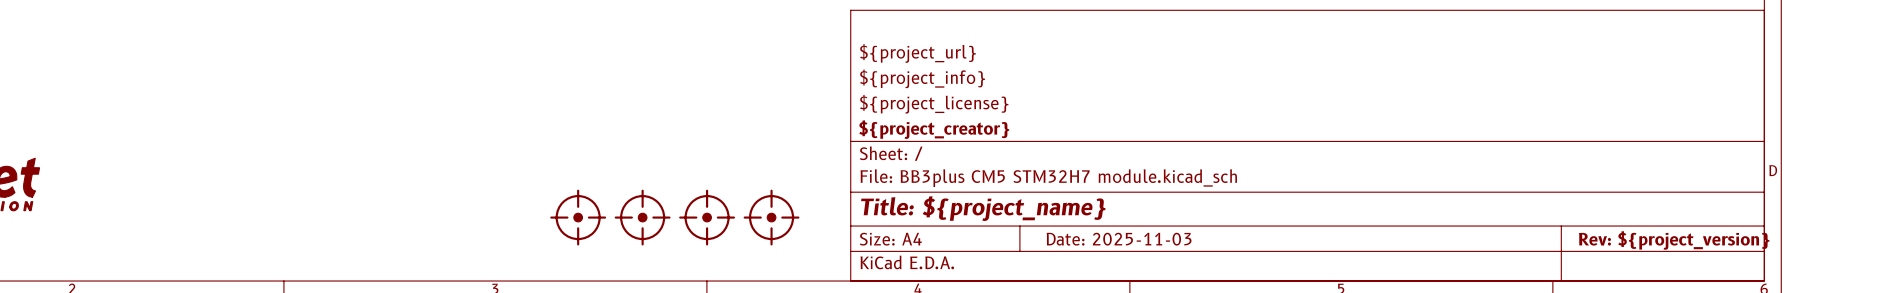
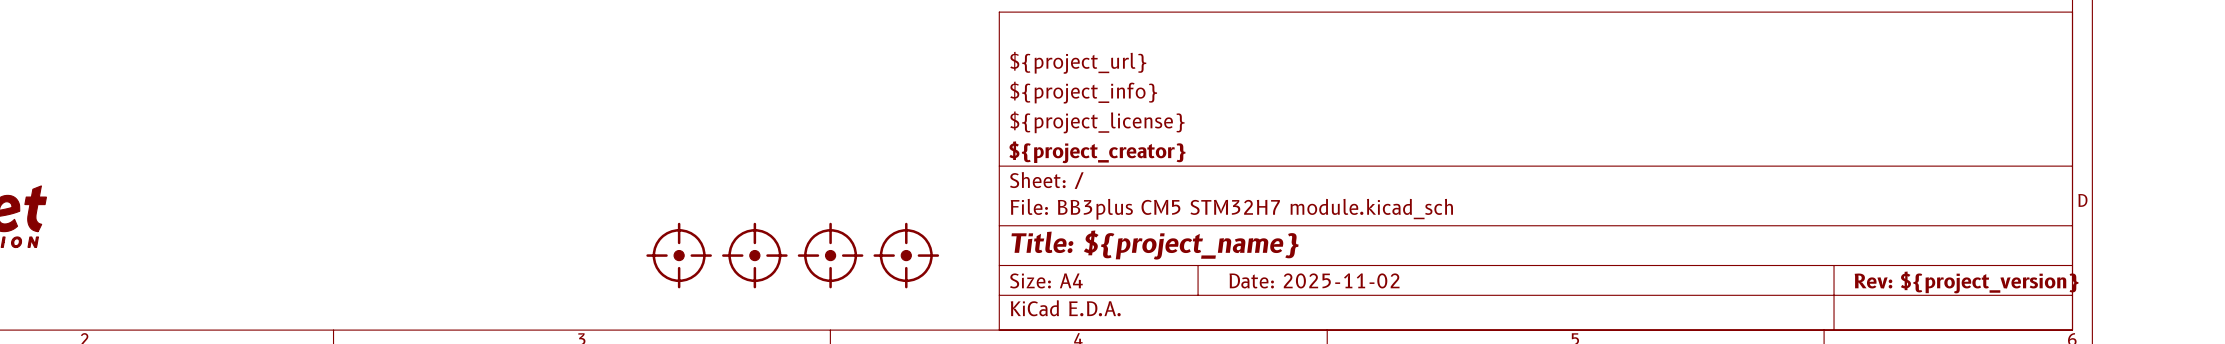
title block: Date: 2025-11-03 (1119, 239) -> Date: 2025-11-02 (1314, 280)

